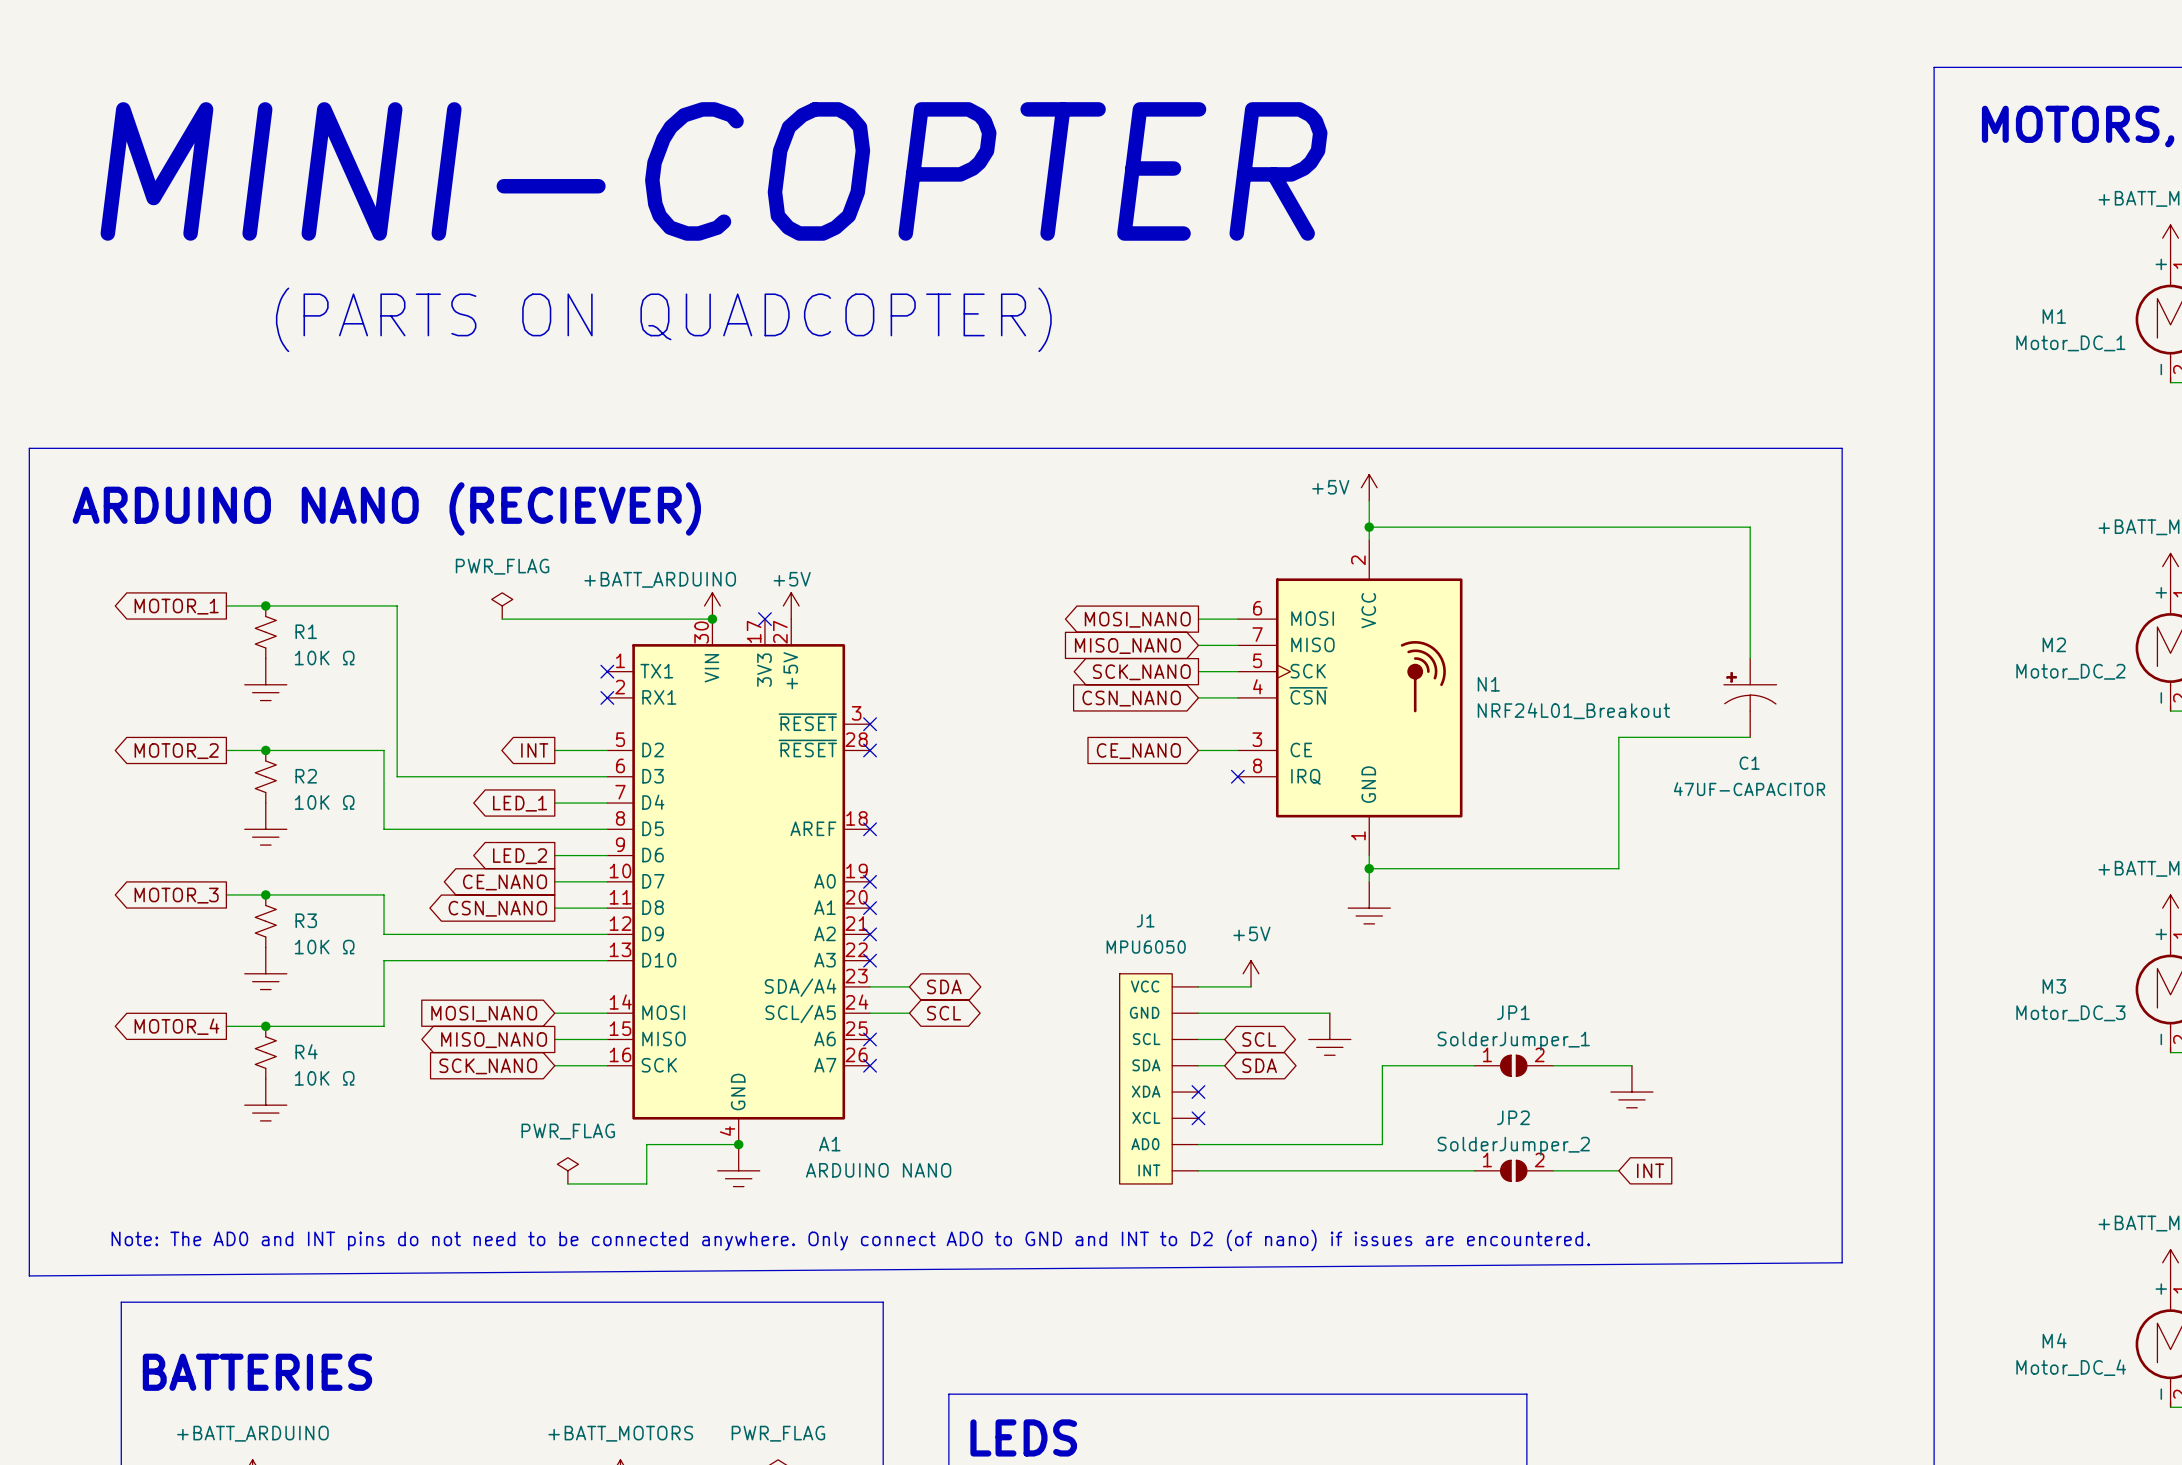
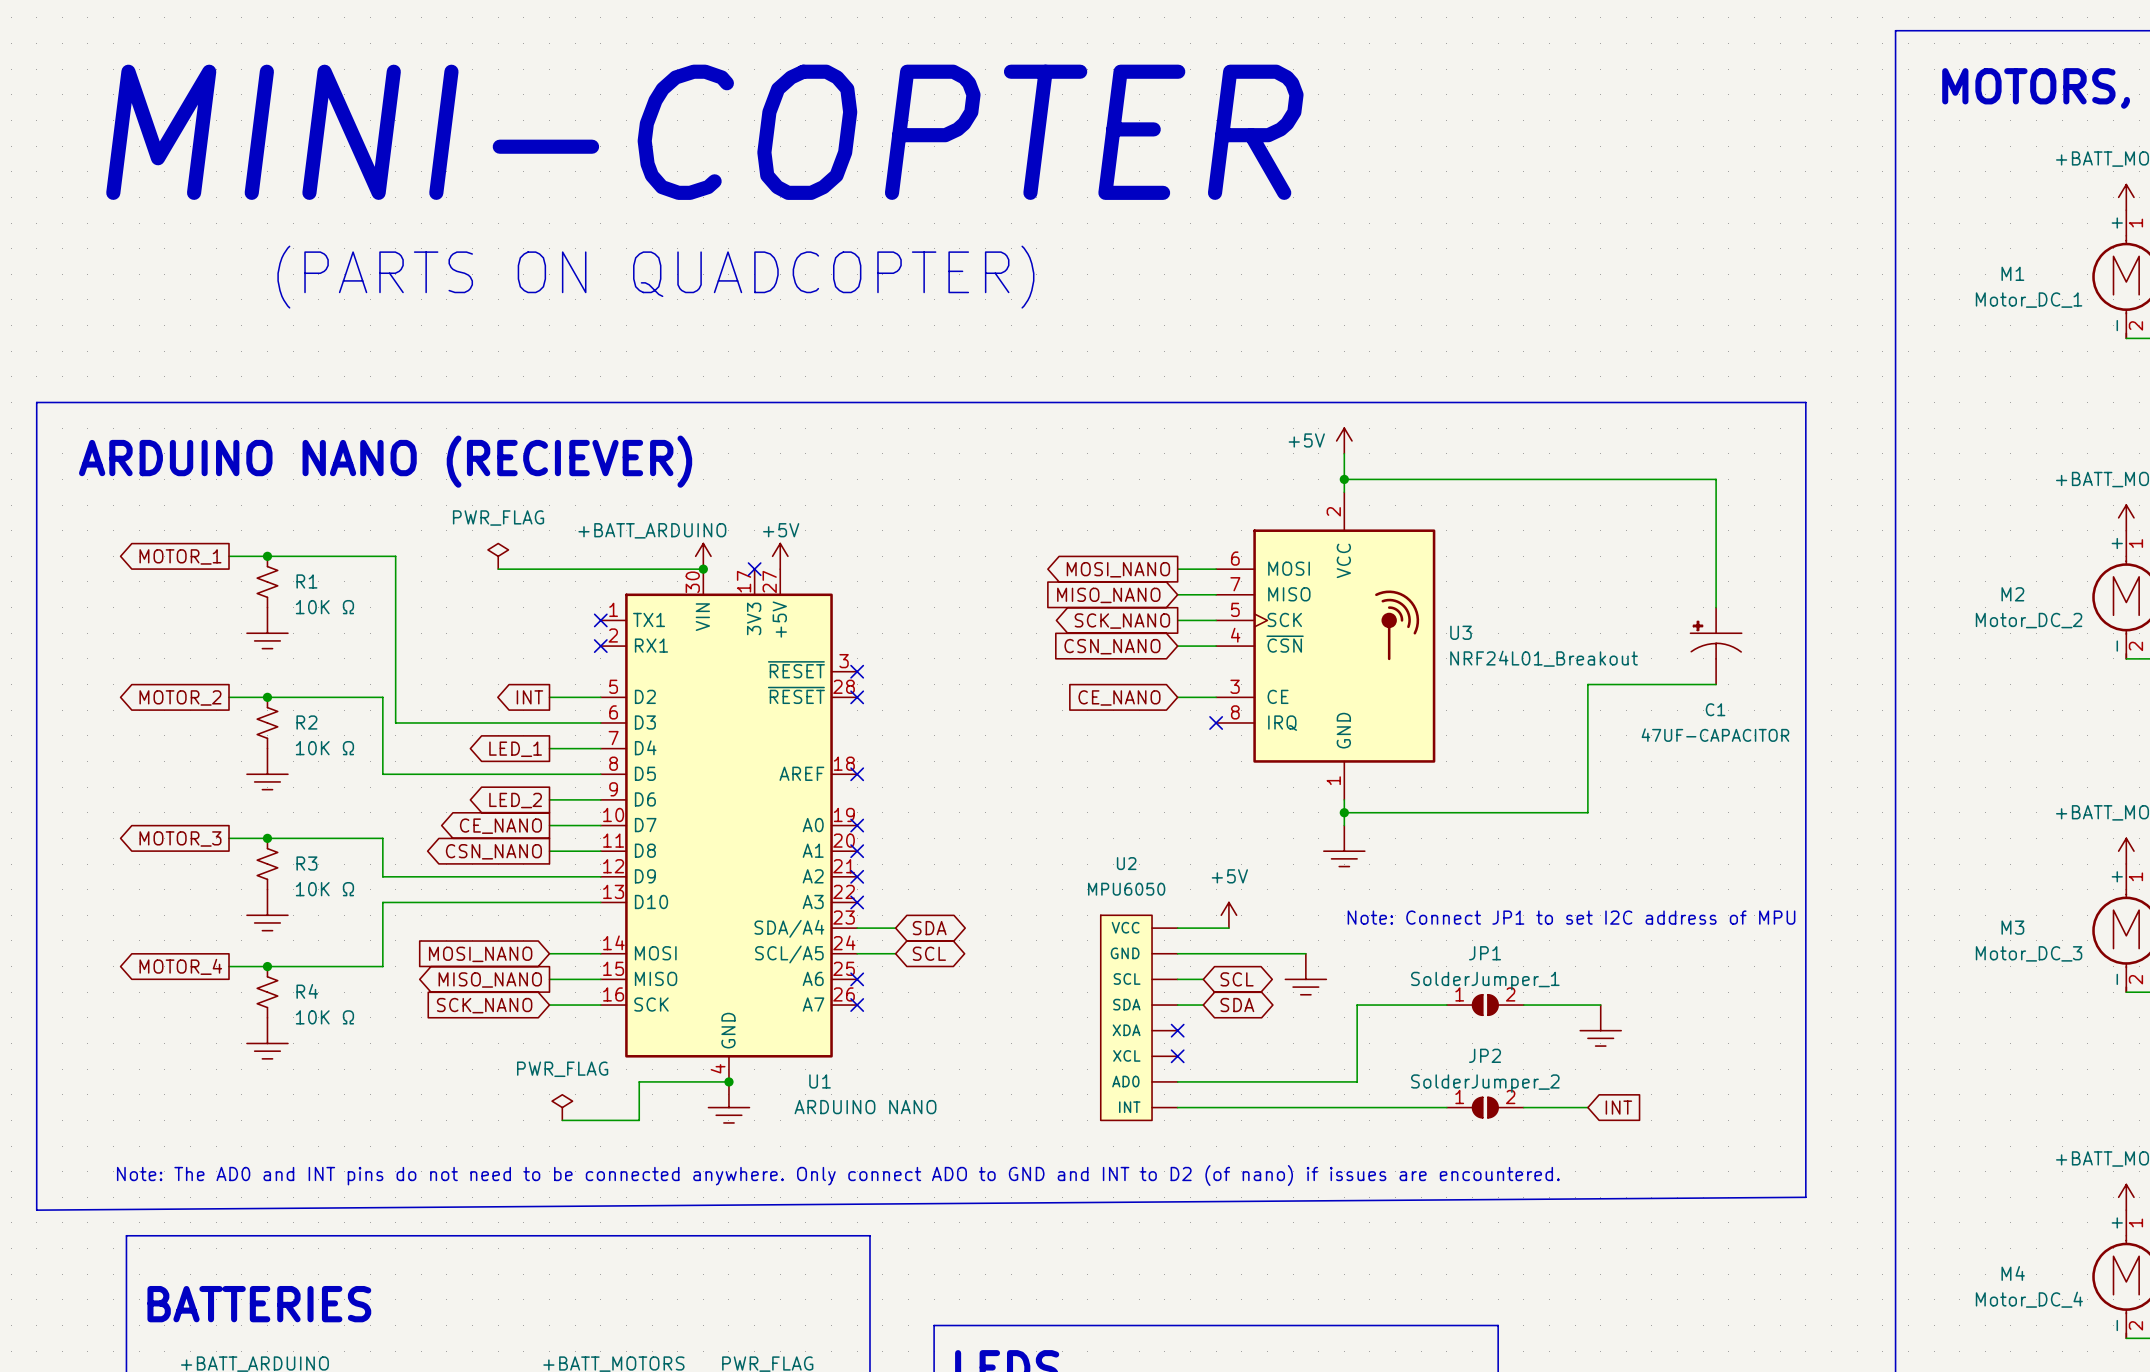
N1 name: N1 (1488, 684) -> U3 (1461, 632)
J1 name: J1 (1145, 920) -> U2 (1126, 863)
text: none -> Note: Connect JP1 to set I2C address of MPU (1571, 917)
A1 name: A1 (829, 1144) -> U1 (820, 1081)

